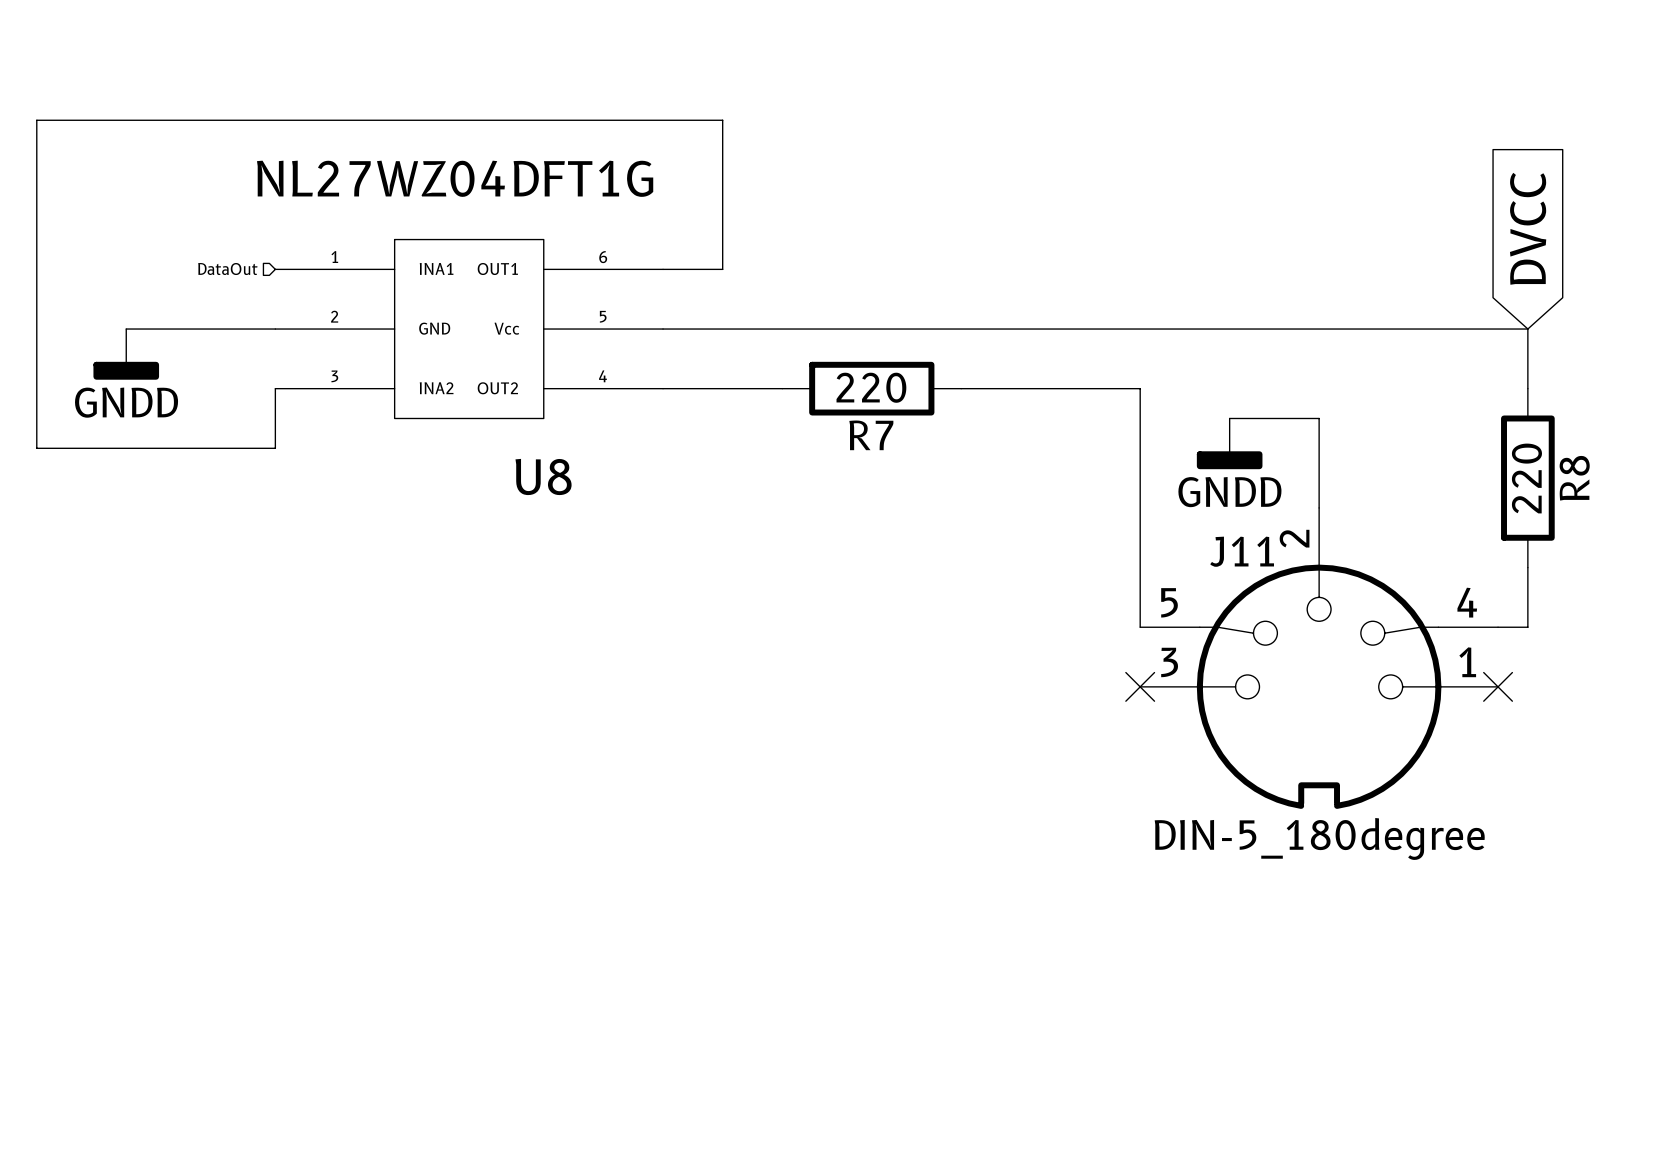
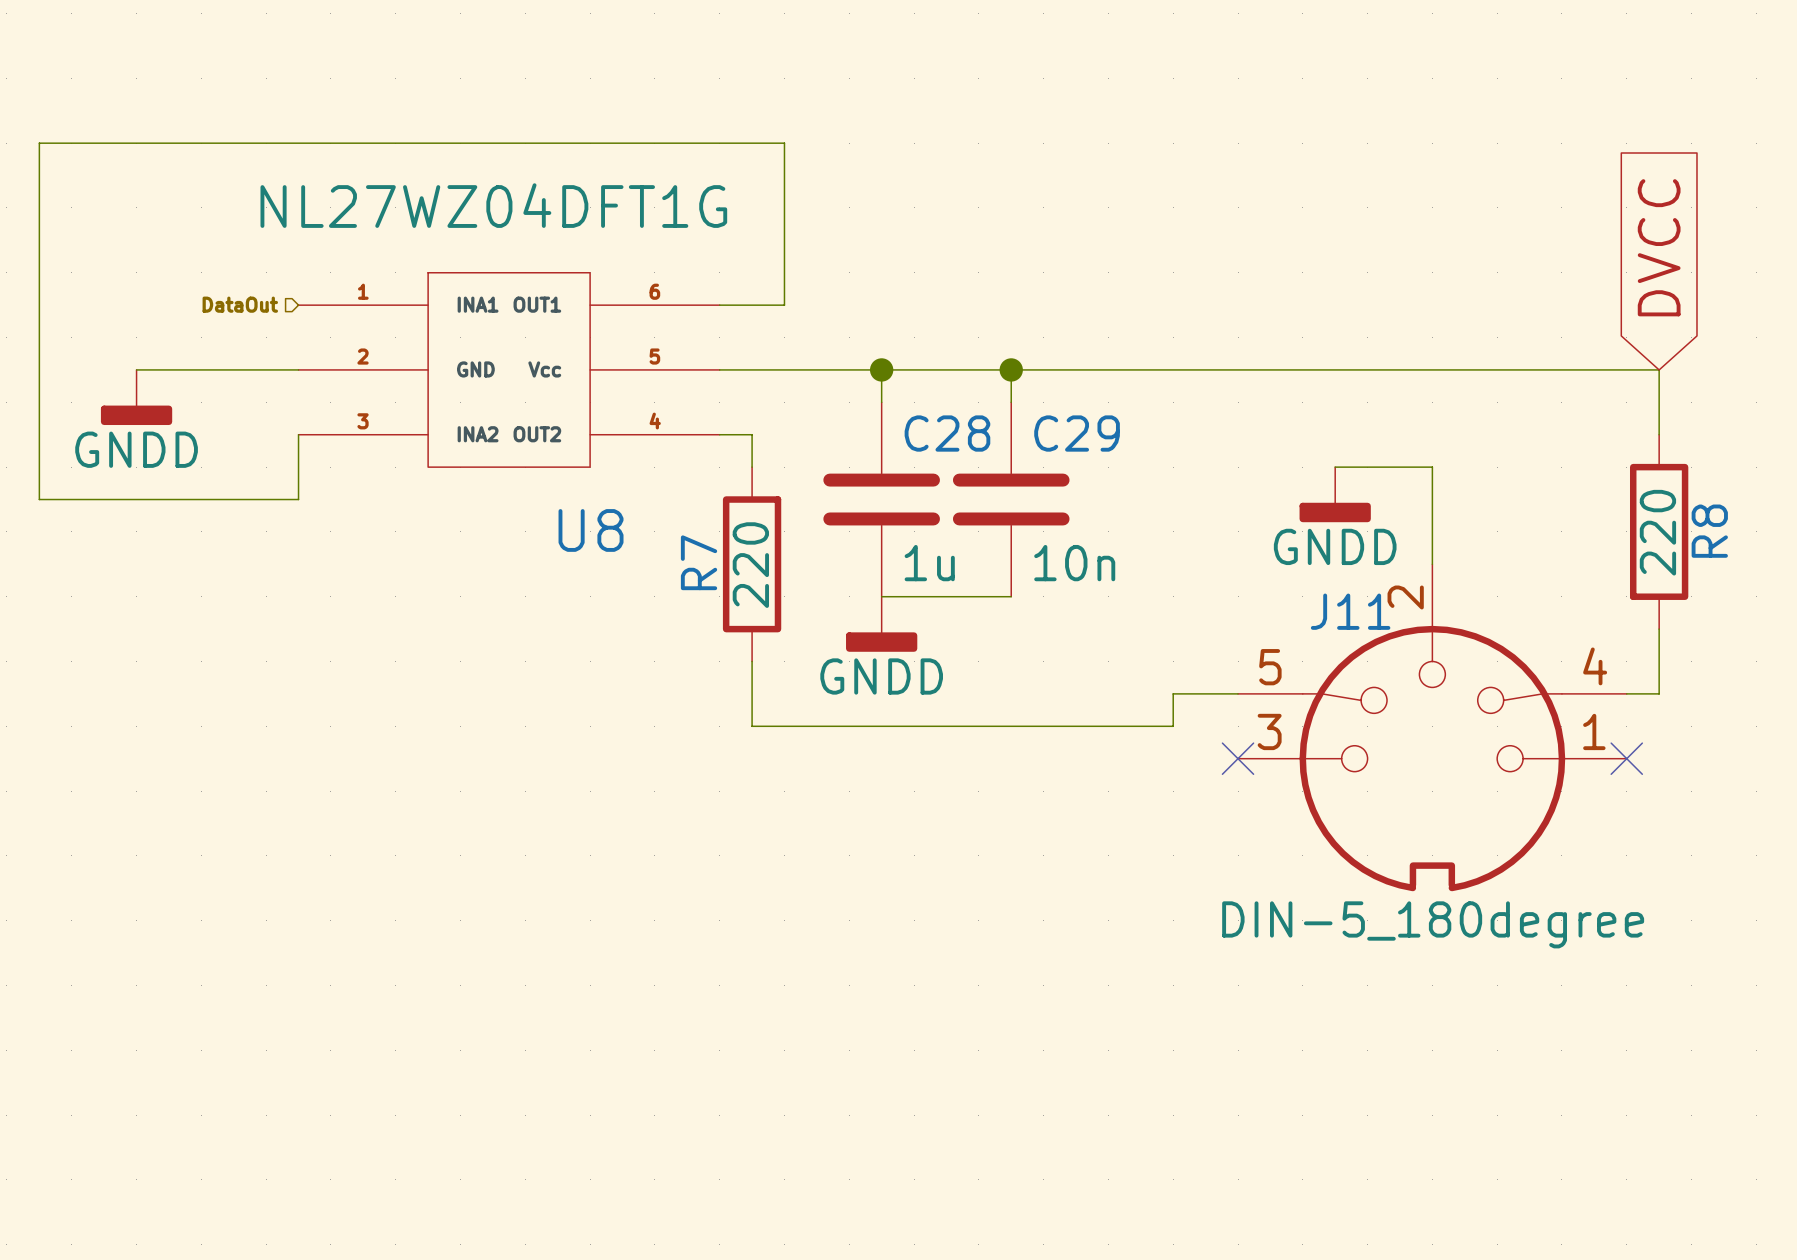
wire: none -> (881, 369) (881, 402)
junction: none -> (881, 369)
wire: none -> (1011, 369) (1011, 402)
junction: none -> (1011, 369)
wire: (692, 388) (782, 388) -> (752, 434) (752, 467)
R7 rotation: 0° (871, 388) -> 90° clockwise (752, 564)
R7 position: (871, 388) -> (752, 564)
wire: (961, 388) (1140, 388) (1140, 627) -> (752, 661) (752, 726) (1173, 726) (1173, 693) (1238, 693)
C28: none -> 1u (881, 499)
C29: none -> 10n (1011, 499)
wire: none -> (881, 596) (1011, 596)
power symbol: none -> GNDD (881, 624)

